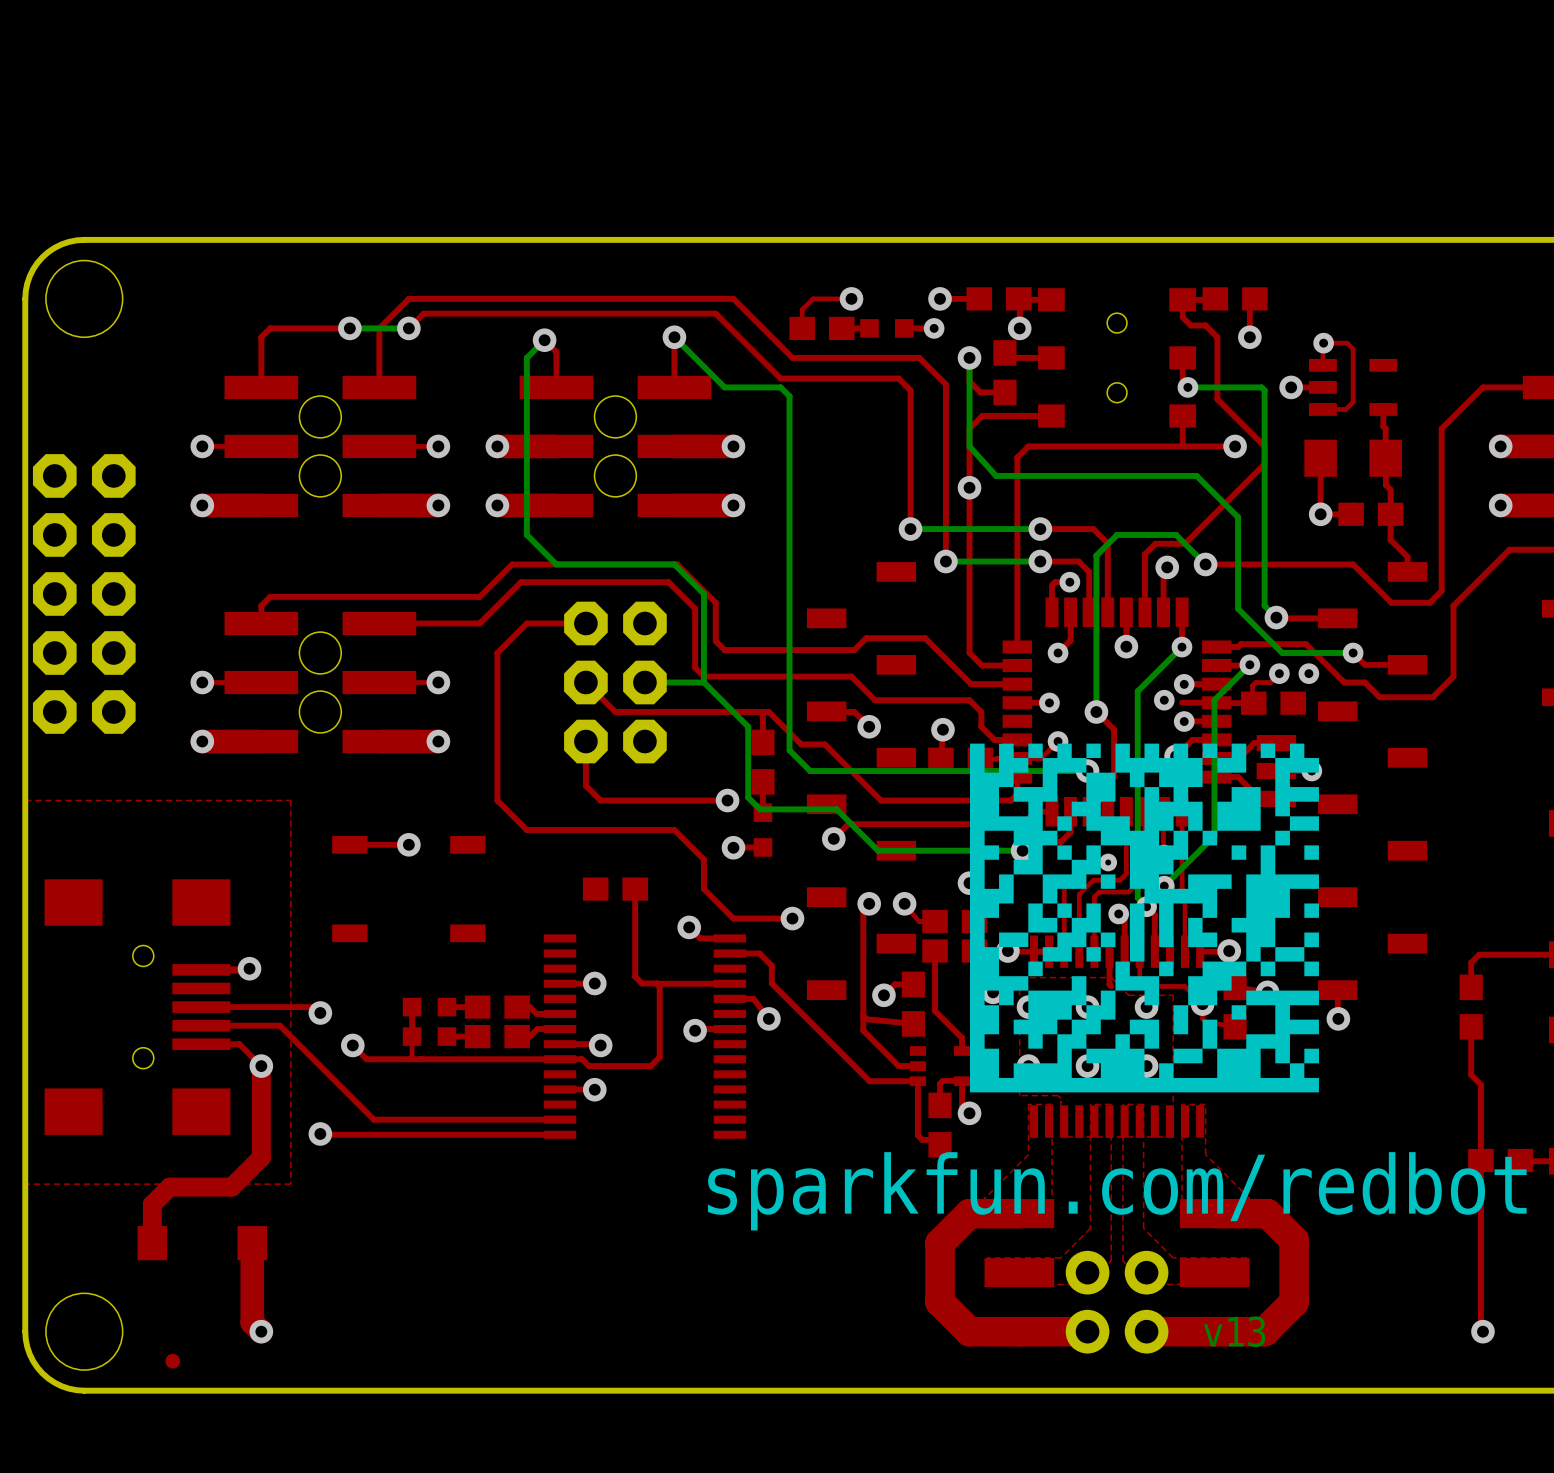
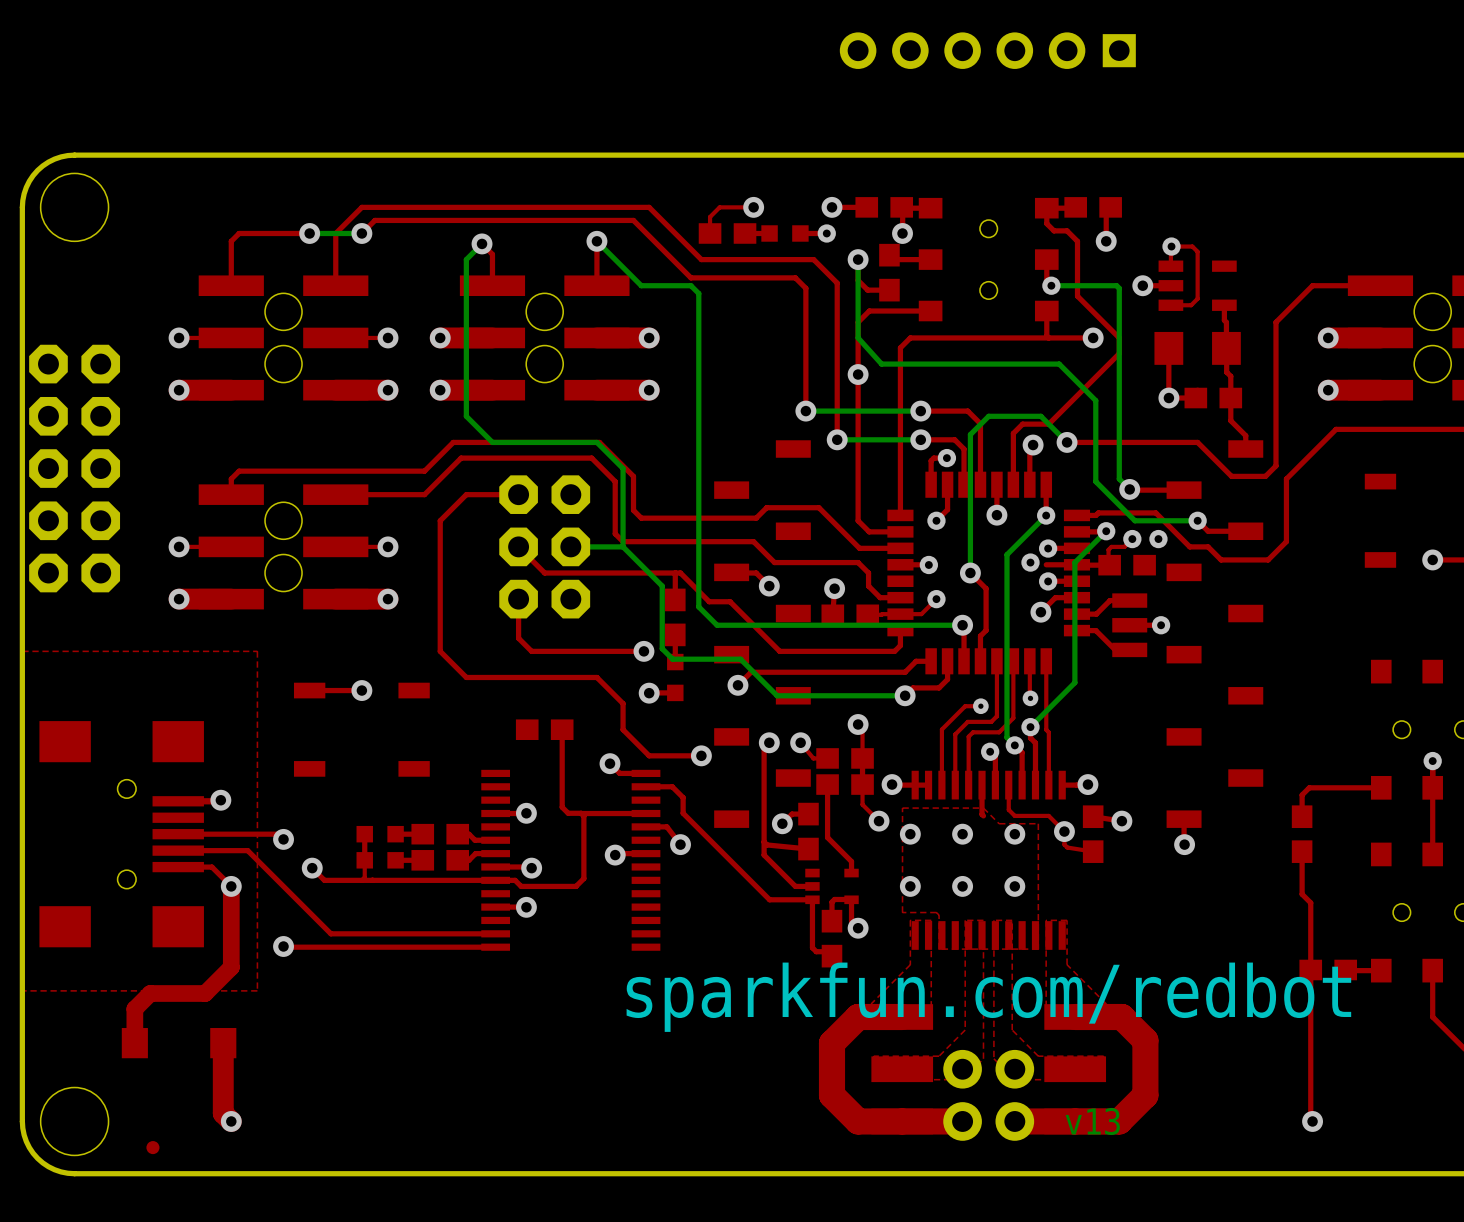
part: none -> (987, 50)
drawing: [969, 743, 1319, 1093] -> none

